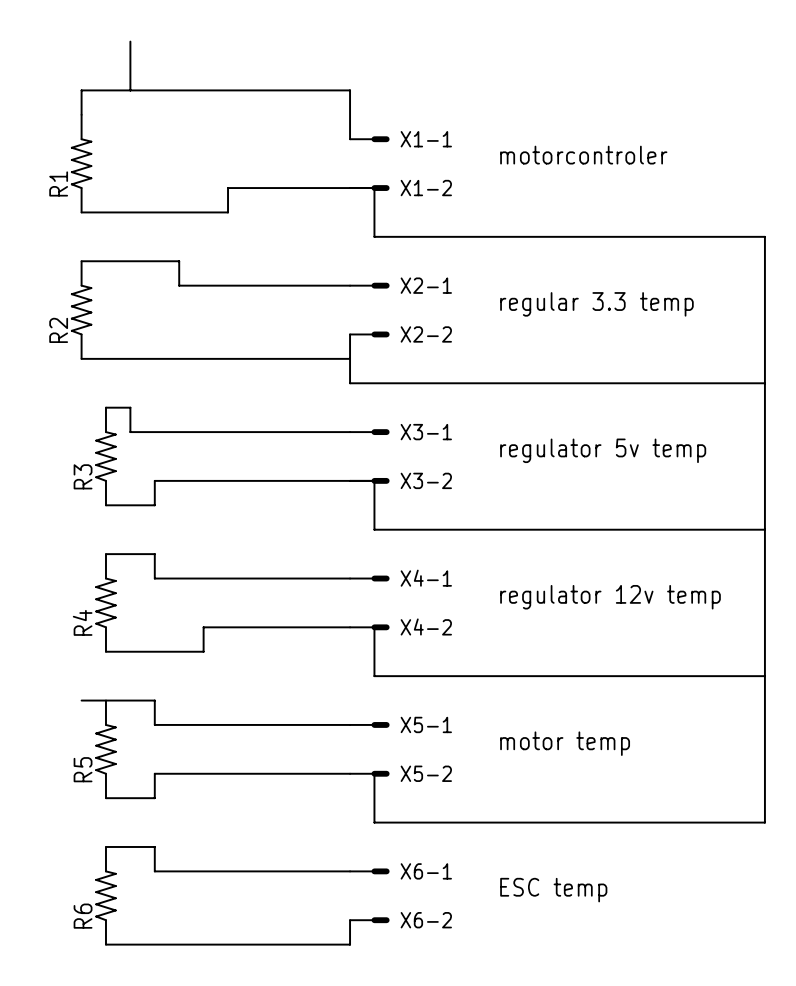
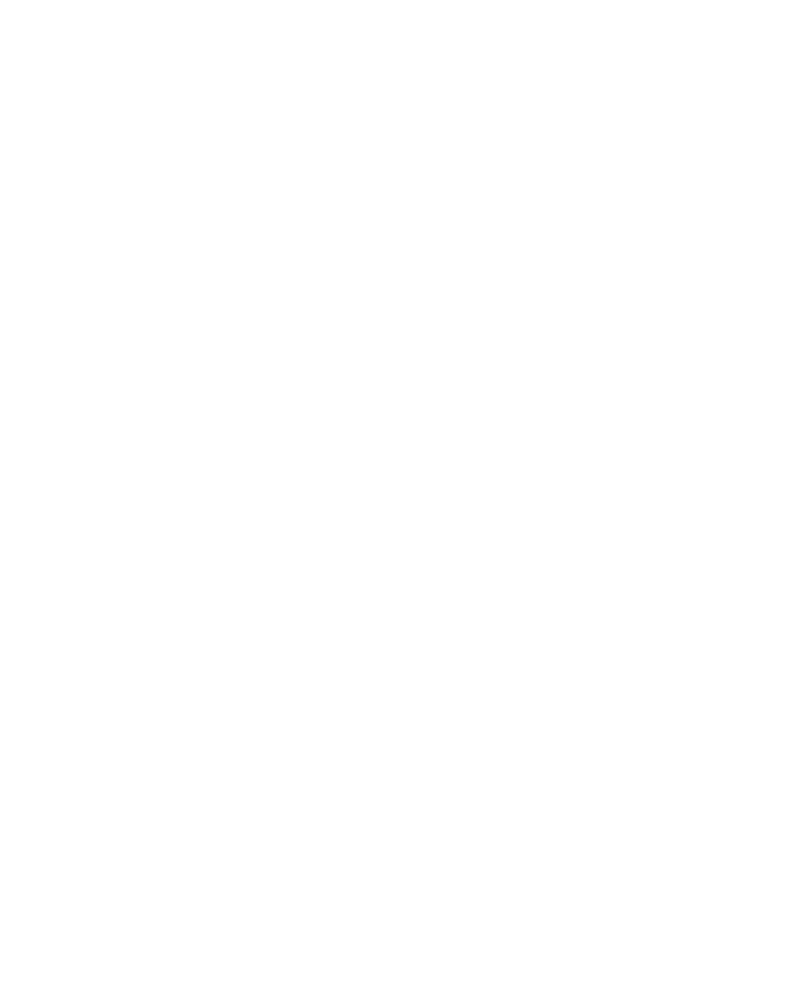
wire: (130, 41) (130, 90) -> none
wire: (81, 114) (81, 90) (350, 90) (350, 139) -> none
X1-1: (369, 139) -> none
text: motorcontroler (583, 155) -> none
R1: (81, 163) -> none
X1-2: (369, 188) -> none
wire: (81, 212) (228, 212) (228, 188) (374, 188) (374, 236) (764, 236) (764, 822) (374, 822) (374, 773) -> none
wire: (81, 261) (179, 261) (179, 285) (350, 285) -> none
X2-1: (369, 285) -> none
text: regular 3.3 temp (596, 304) -> none
R2: (81, 310) -> none
wire: (350, 334) (350, 383) (764, 383) -> none
X2-2: (369, 334) -> none
wire: (81, 358) (350, 358) -> none
wire: (105, 407) (130, 407) (130, 432) (350, 432) -> none
X3-1: (369, 432) -> none
text: regulator 5v temp (603, 450) -> none
R3: (105, 456) -> none
X3-2: (369, 480) -> none
wire: (105, 505) (154, 505) (154, 480) (374, 480) (374, 529) (764, 529) -> none
wire: (105, 554) (154, 554) (154, 578) (350, 578) -> none
X4-1: (369, 578) -> none
text: regulator 12v temp (610, 597) -> none
R4: (105, 602) -> none
wire: (350, 627) (203, 627) (203, 651) (105, 651) -> none
X4-2: (369, 627) -> none
wire: (374, 627) (374, 676) (764, 676) -> none
wire: (81, 700) (154, 700) (154, 724) (350, 724) -> none
X5-1: (369, 724) -> none
text: motor temp (565, 743) -> none
R5: (105, 749) -> none
wire: (350, 773) (154, 773) (154, 798) (105, 798) -> none
X5-2: (369, 773) -> none
wire: (105, 846) (154, 846) (154, 871) (350, 871) -> none
X6-1: (369, 871) -> none
text: ESC temp (553, 890) -> none
R6: (105, 895) -> none
wire: (350, 920) (350, 944) (105, 944) -> none
X6-2: (369, 920) -> none

